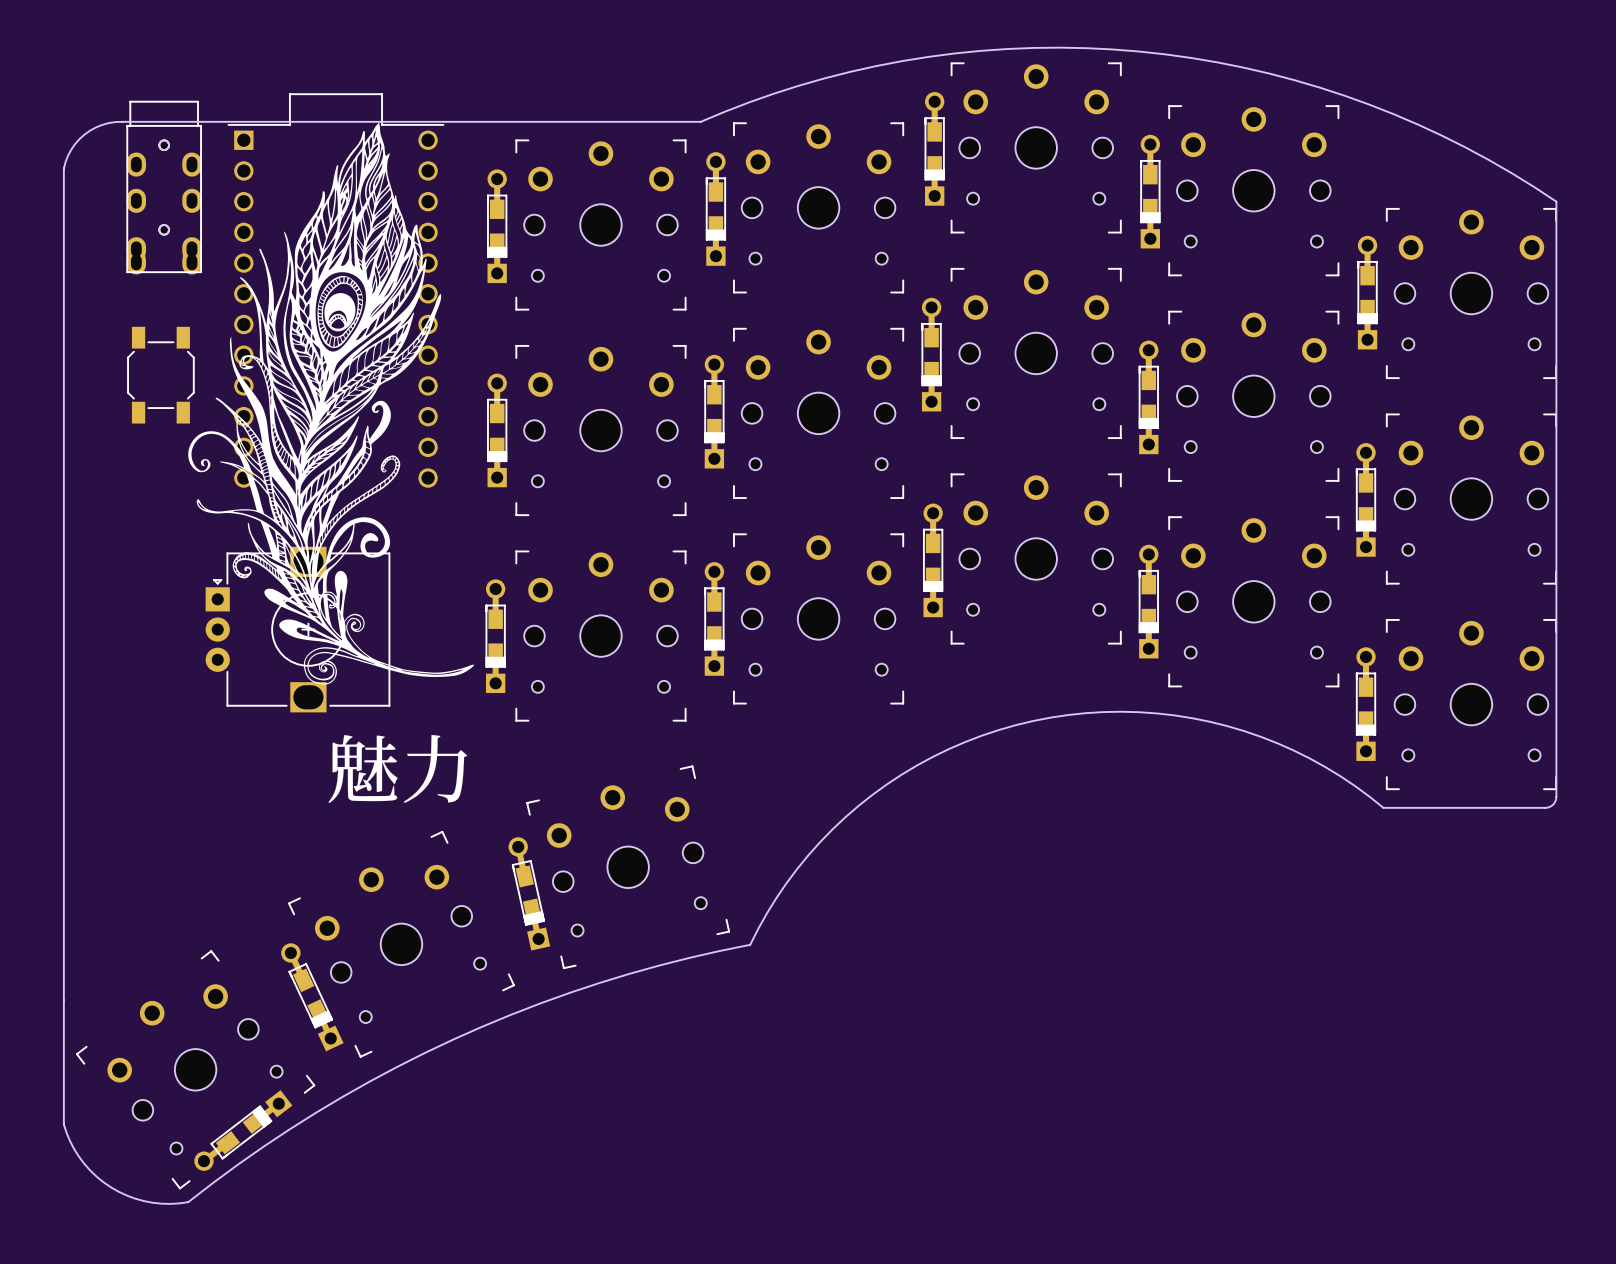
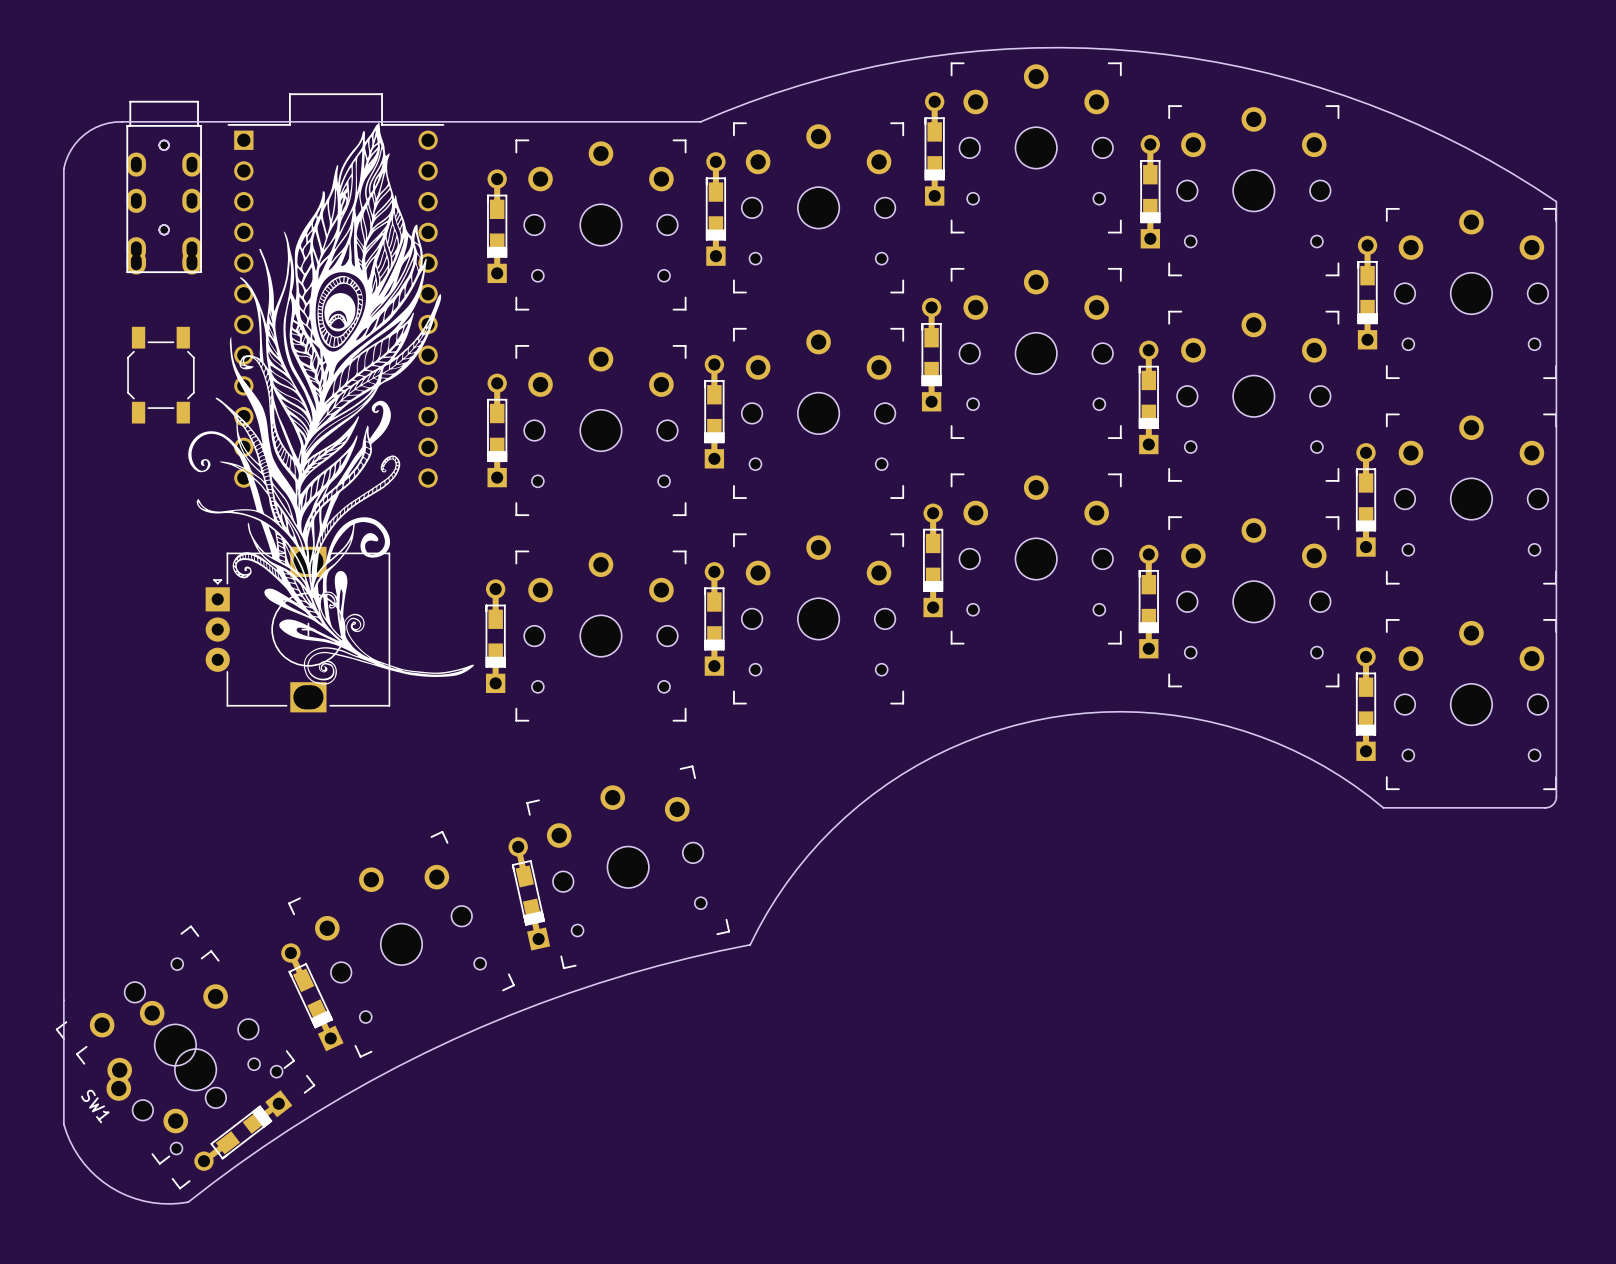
drawing: [328, 735, 468, 804] -> none
SW1: none -> (175, 1045)

